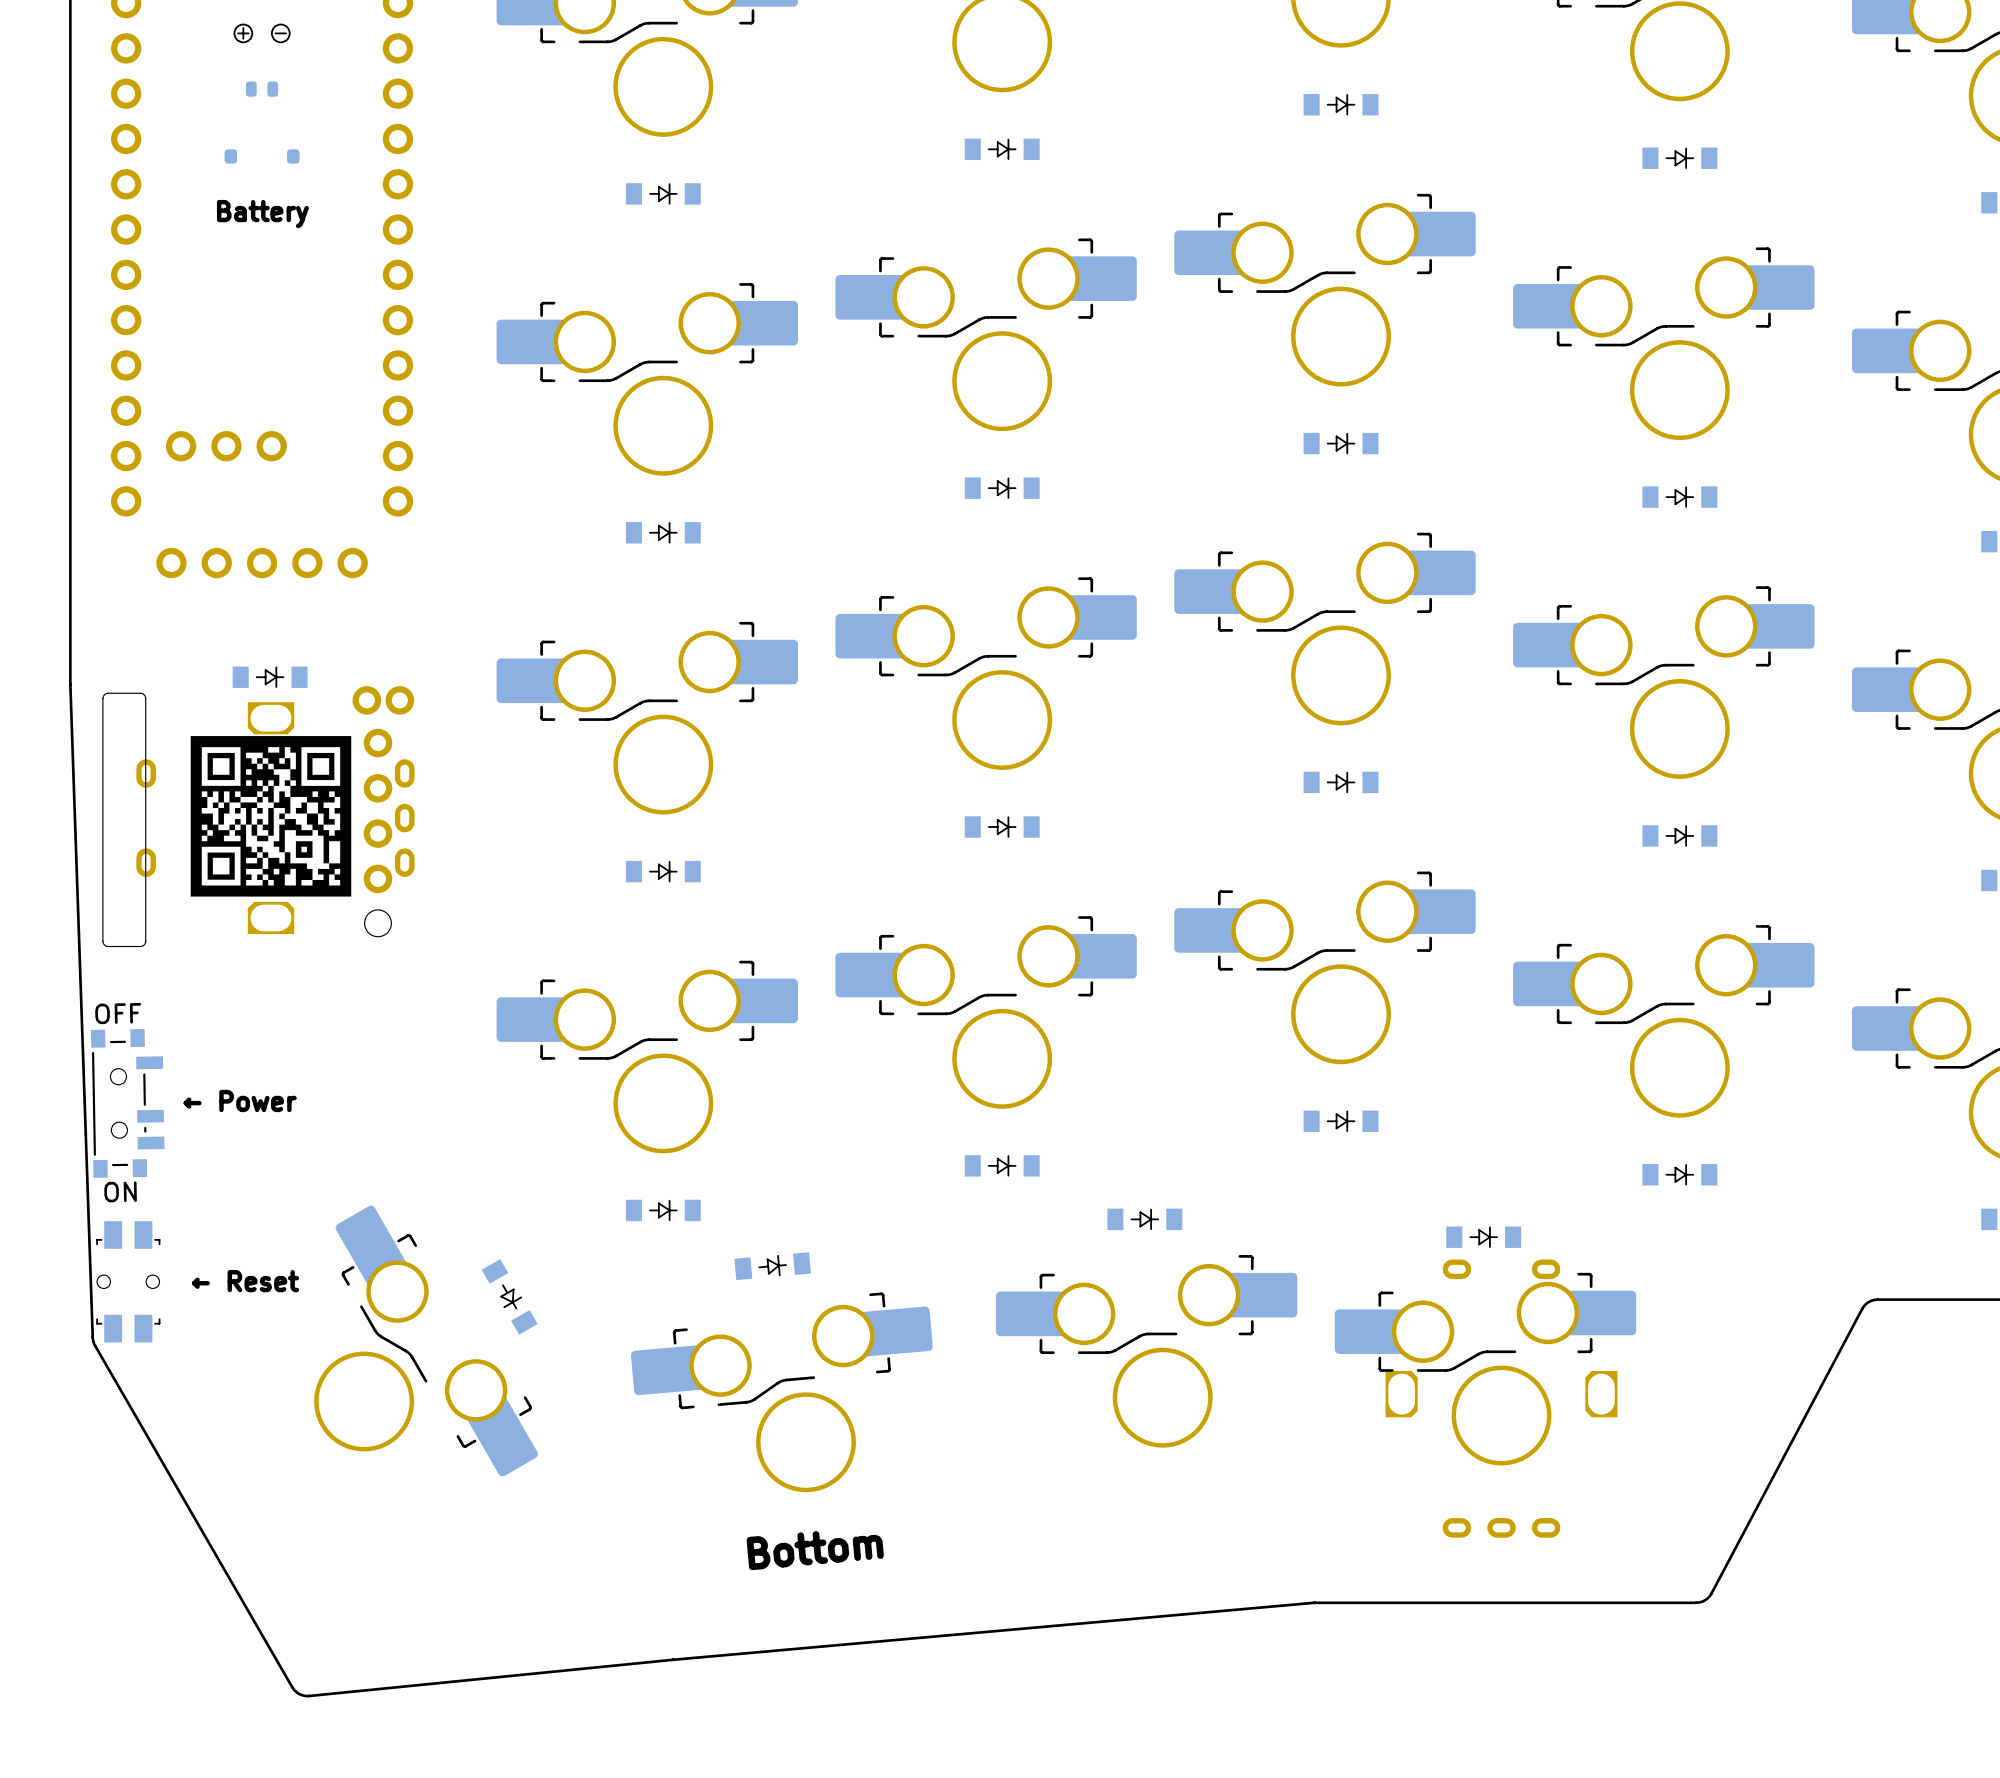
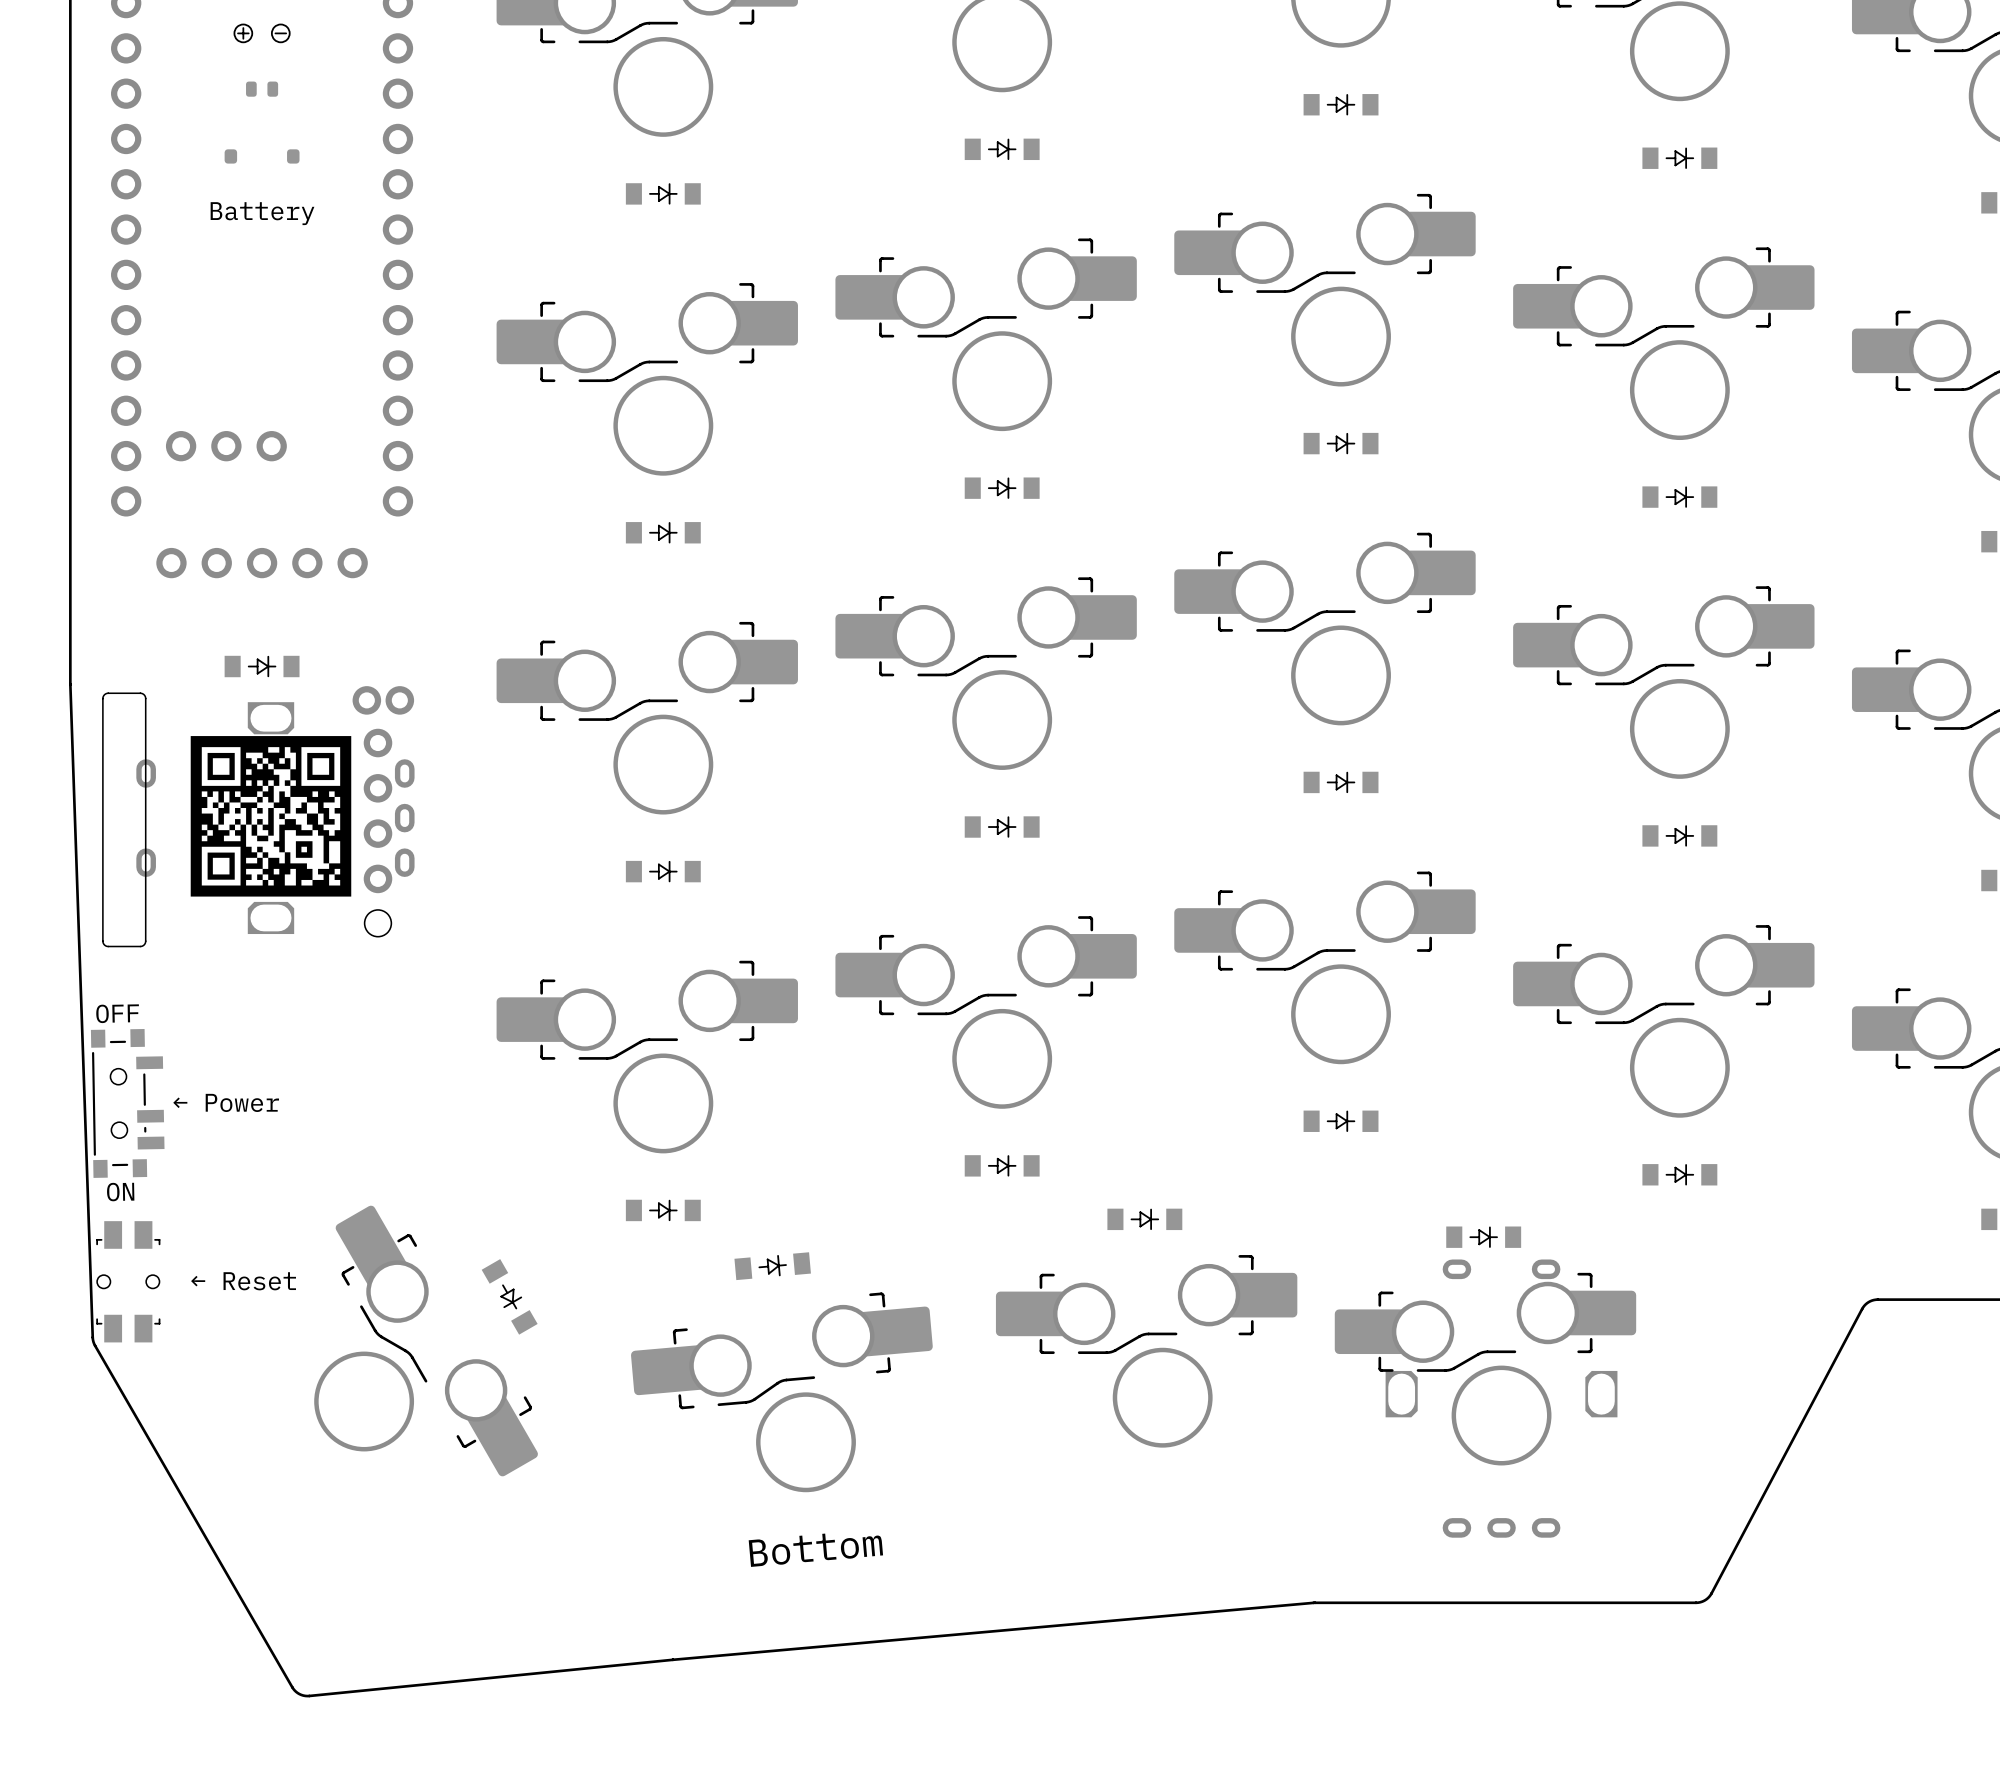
part position: (270, 677) -> (262, 666)
text position: ← Power (240, 1100) -> ← Power (226, 1102)

